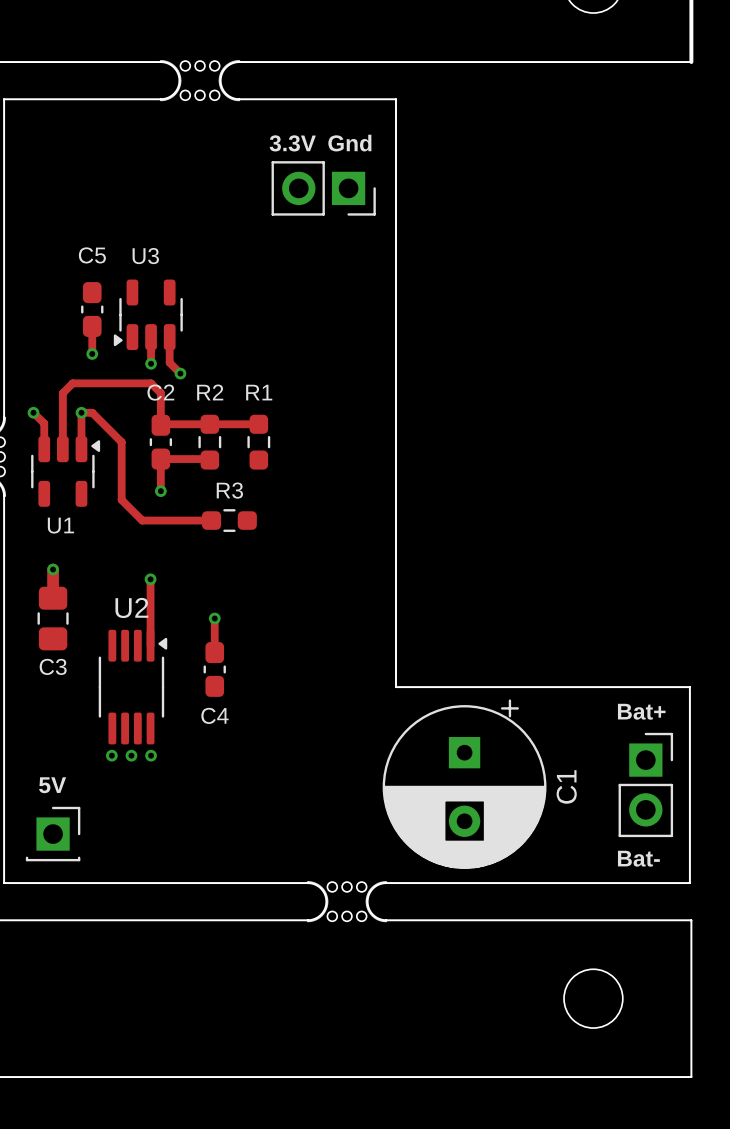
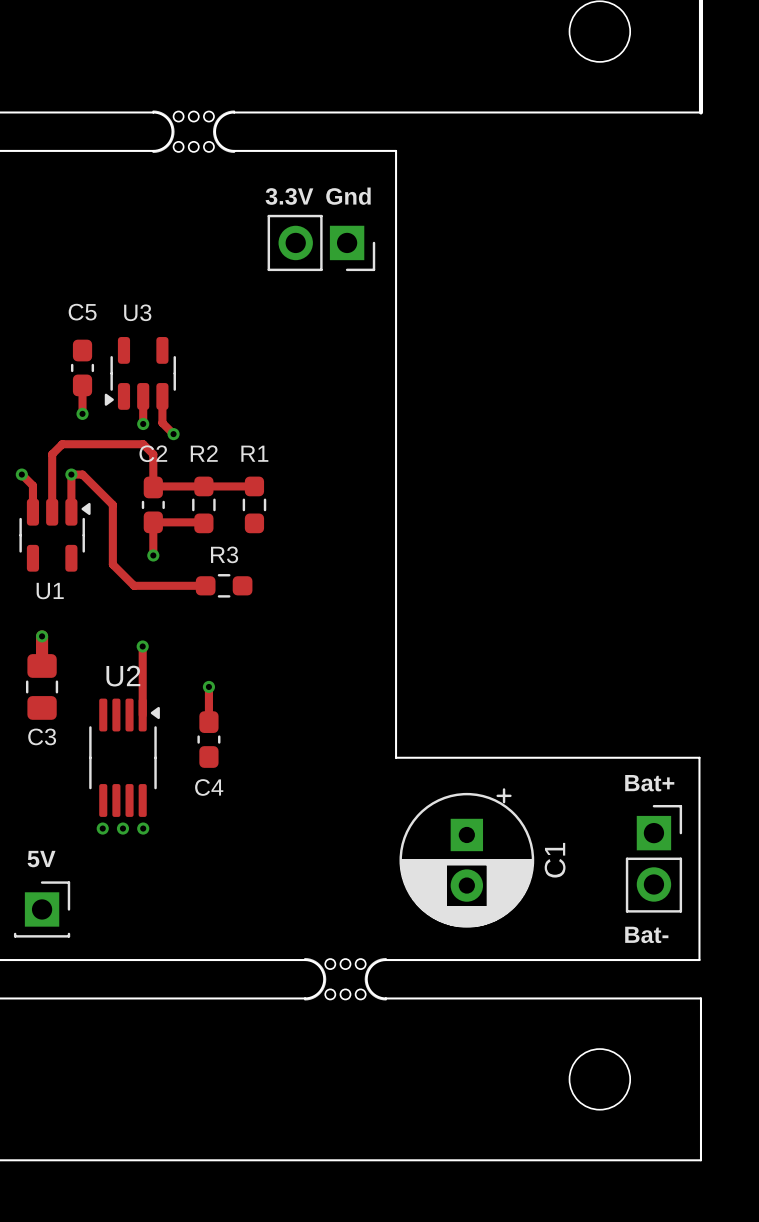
C1 footprint: [382, 699, 547, 869] -> [399, 788, 535, 928]

